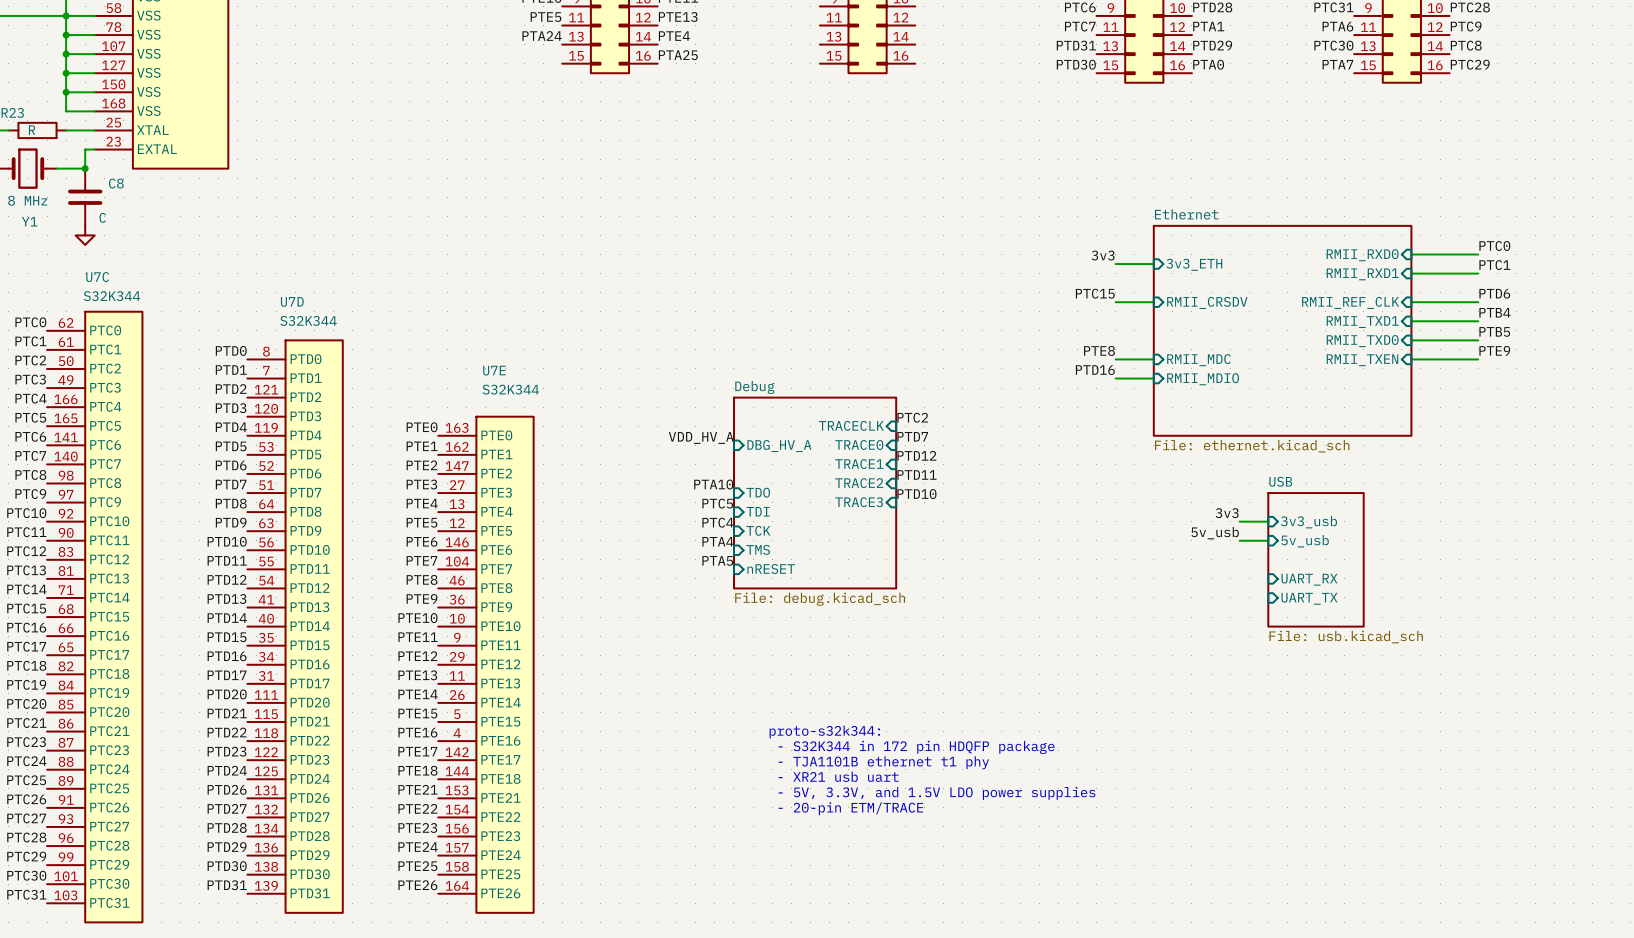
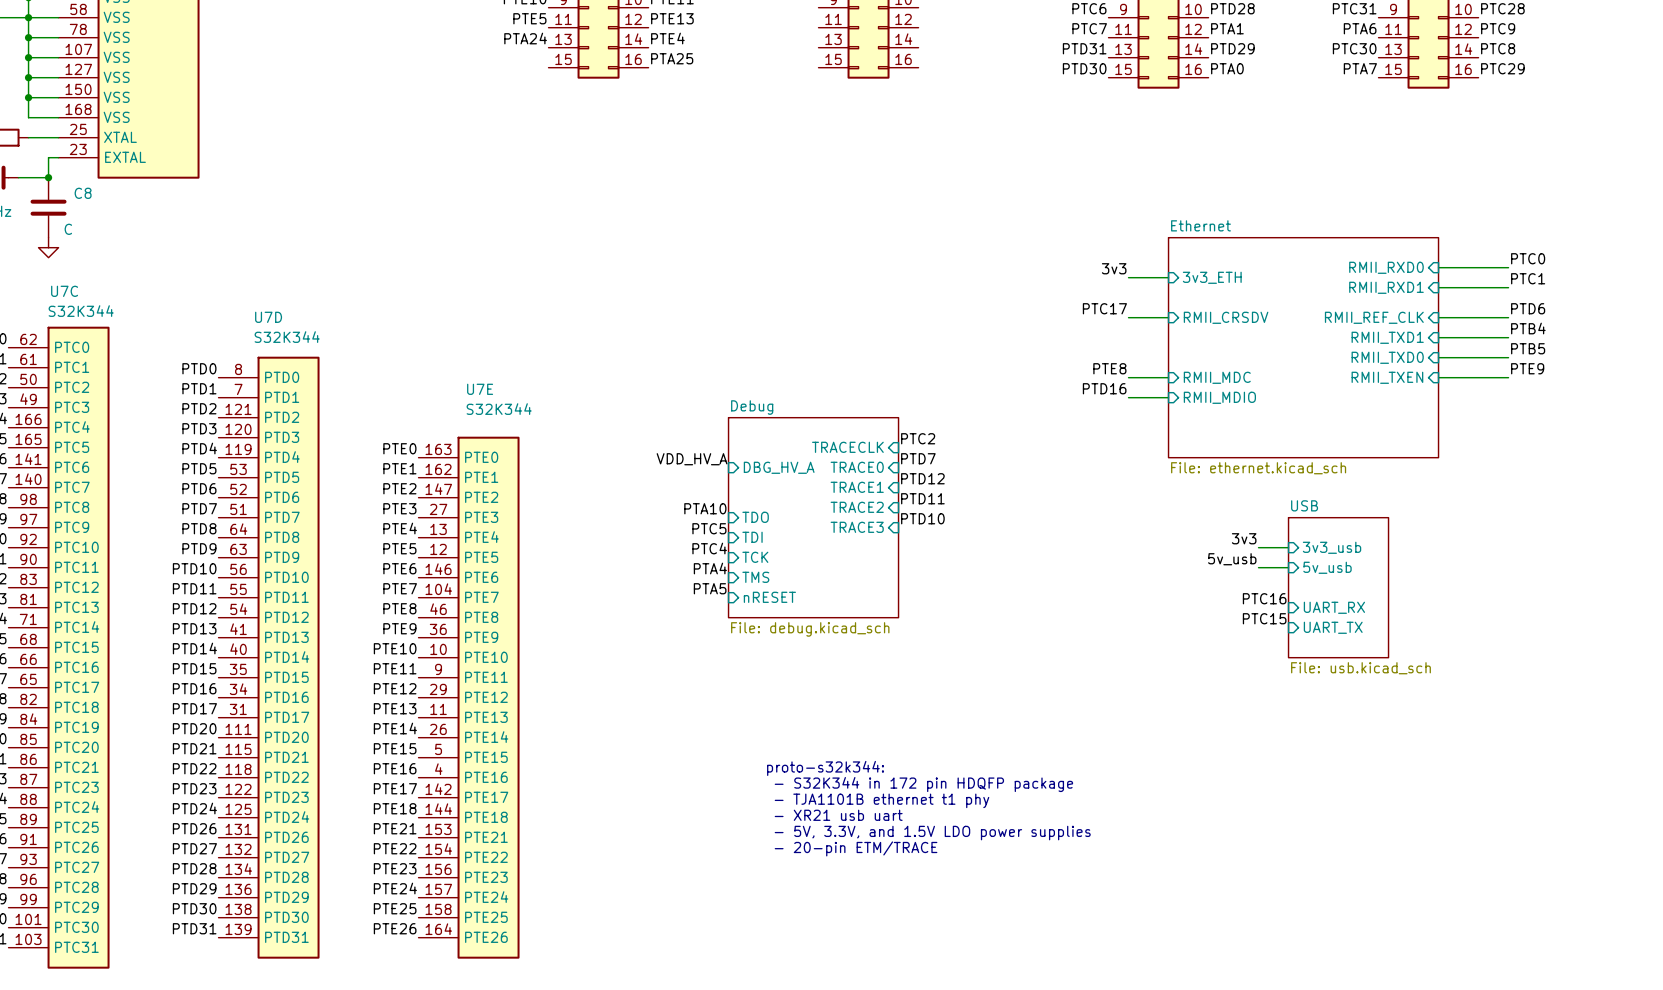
label: PTC15 (1095, 293) -> PTC17 (1104, 308)
label: none -> PTC16 (1264, 598)
label: none -> PTC15 (1264, 618)

